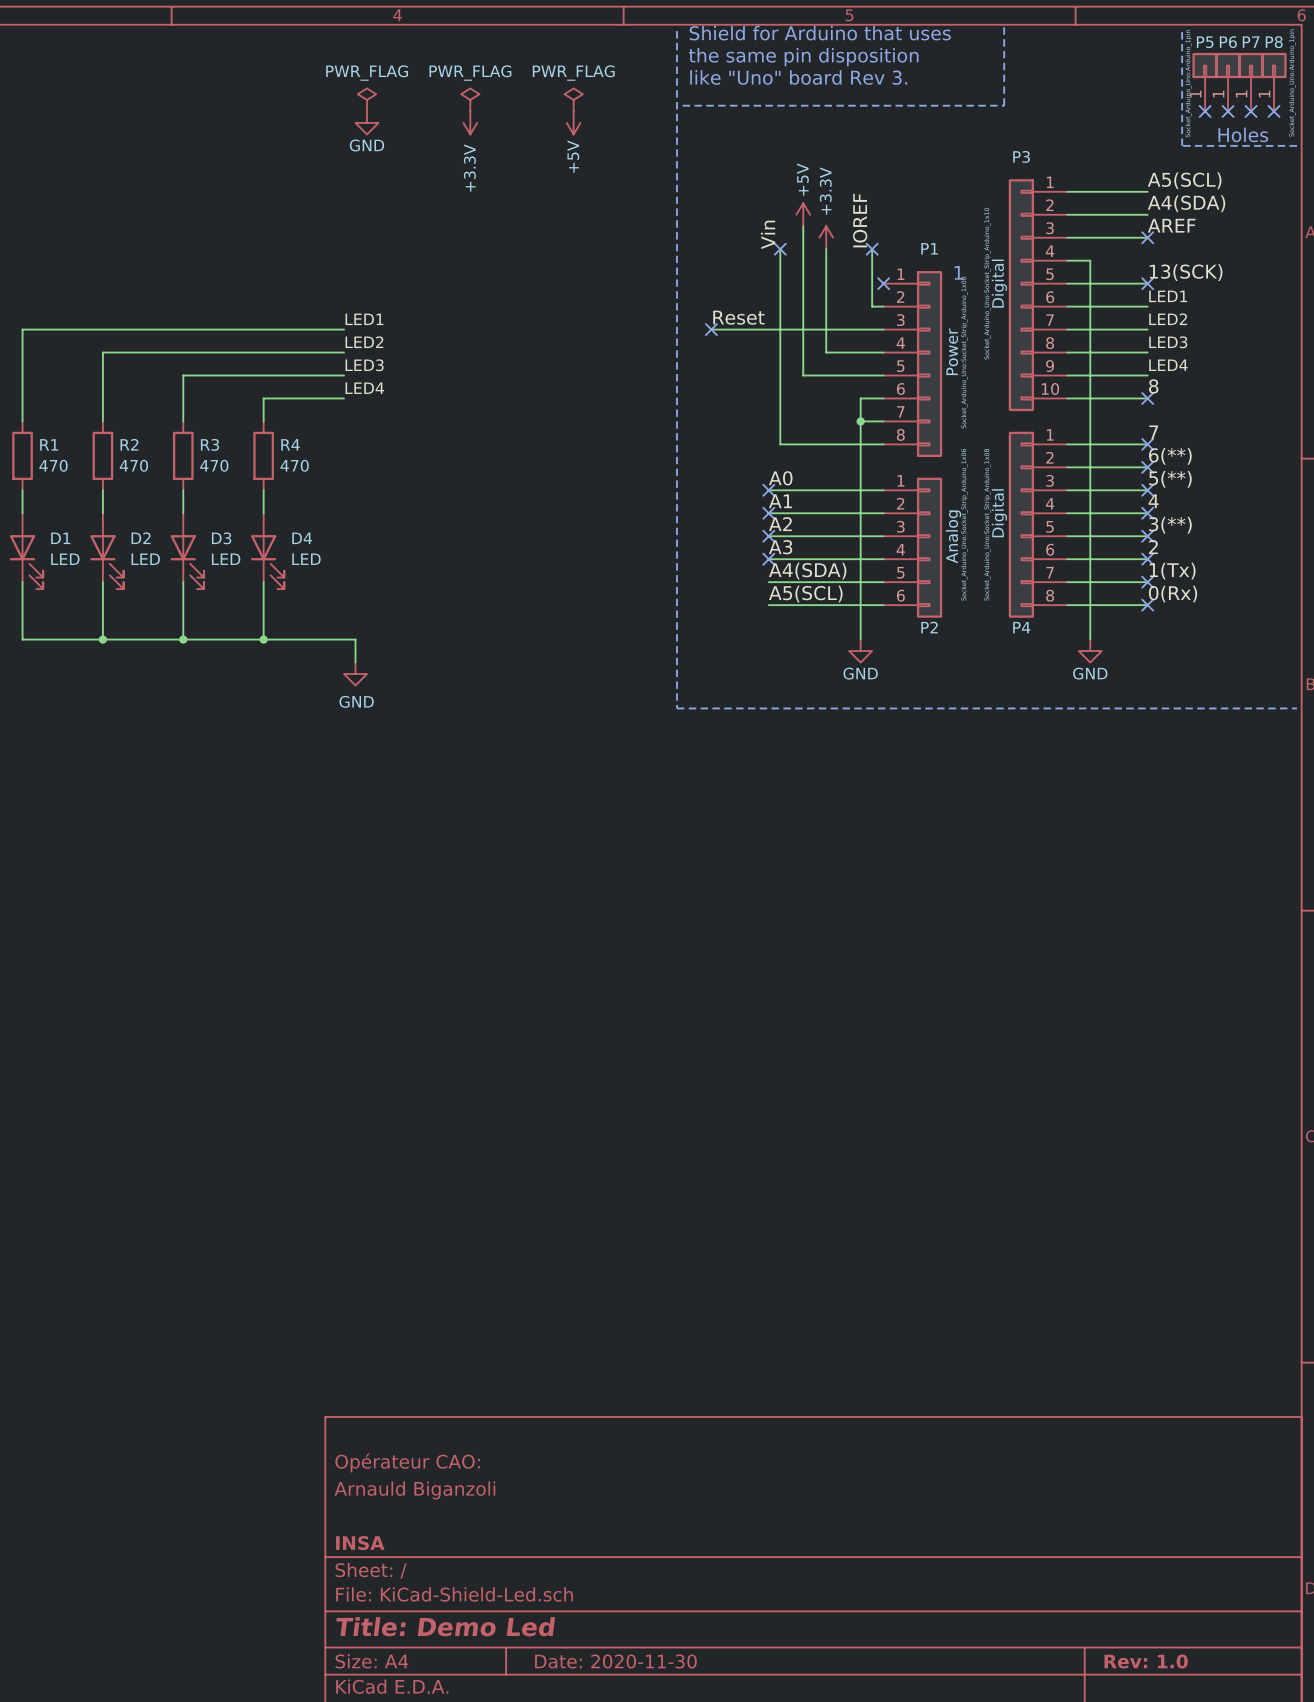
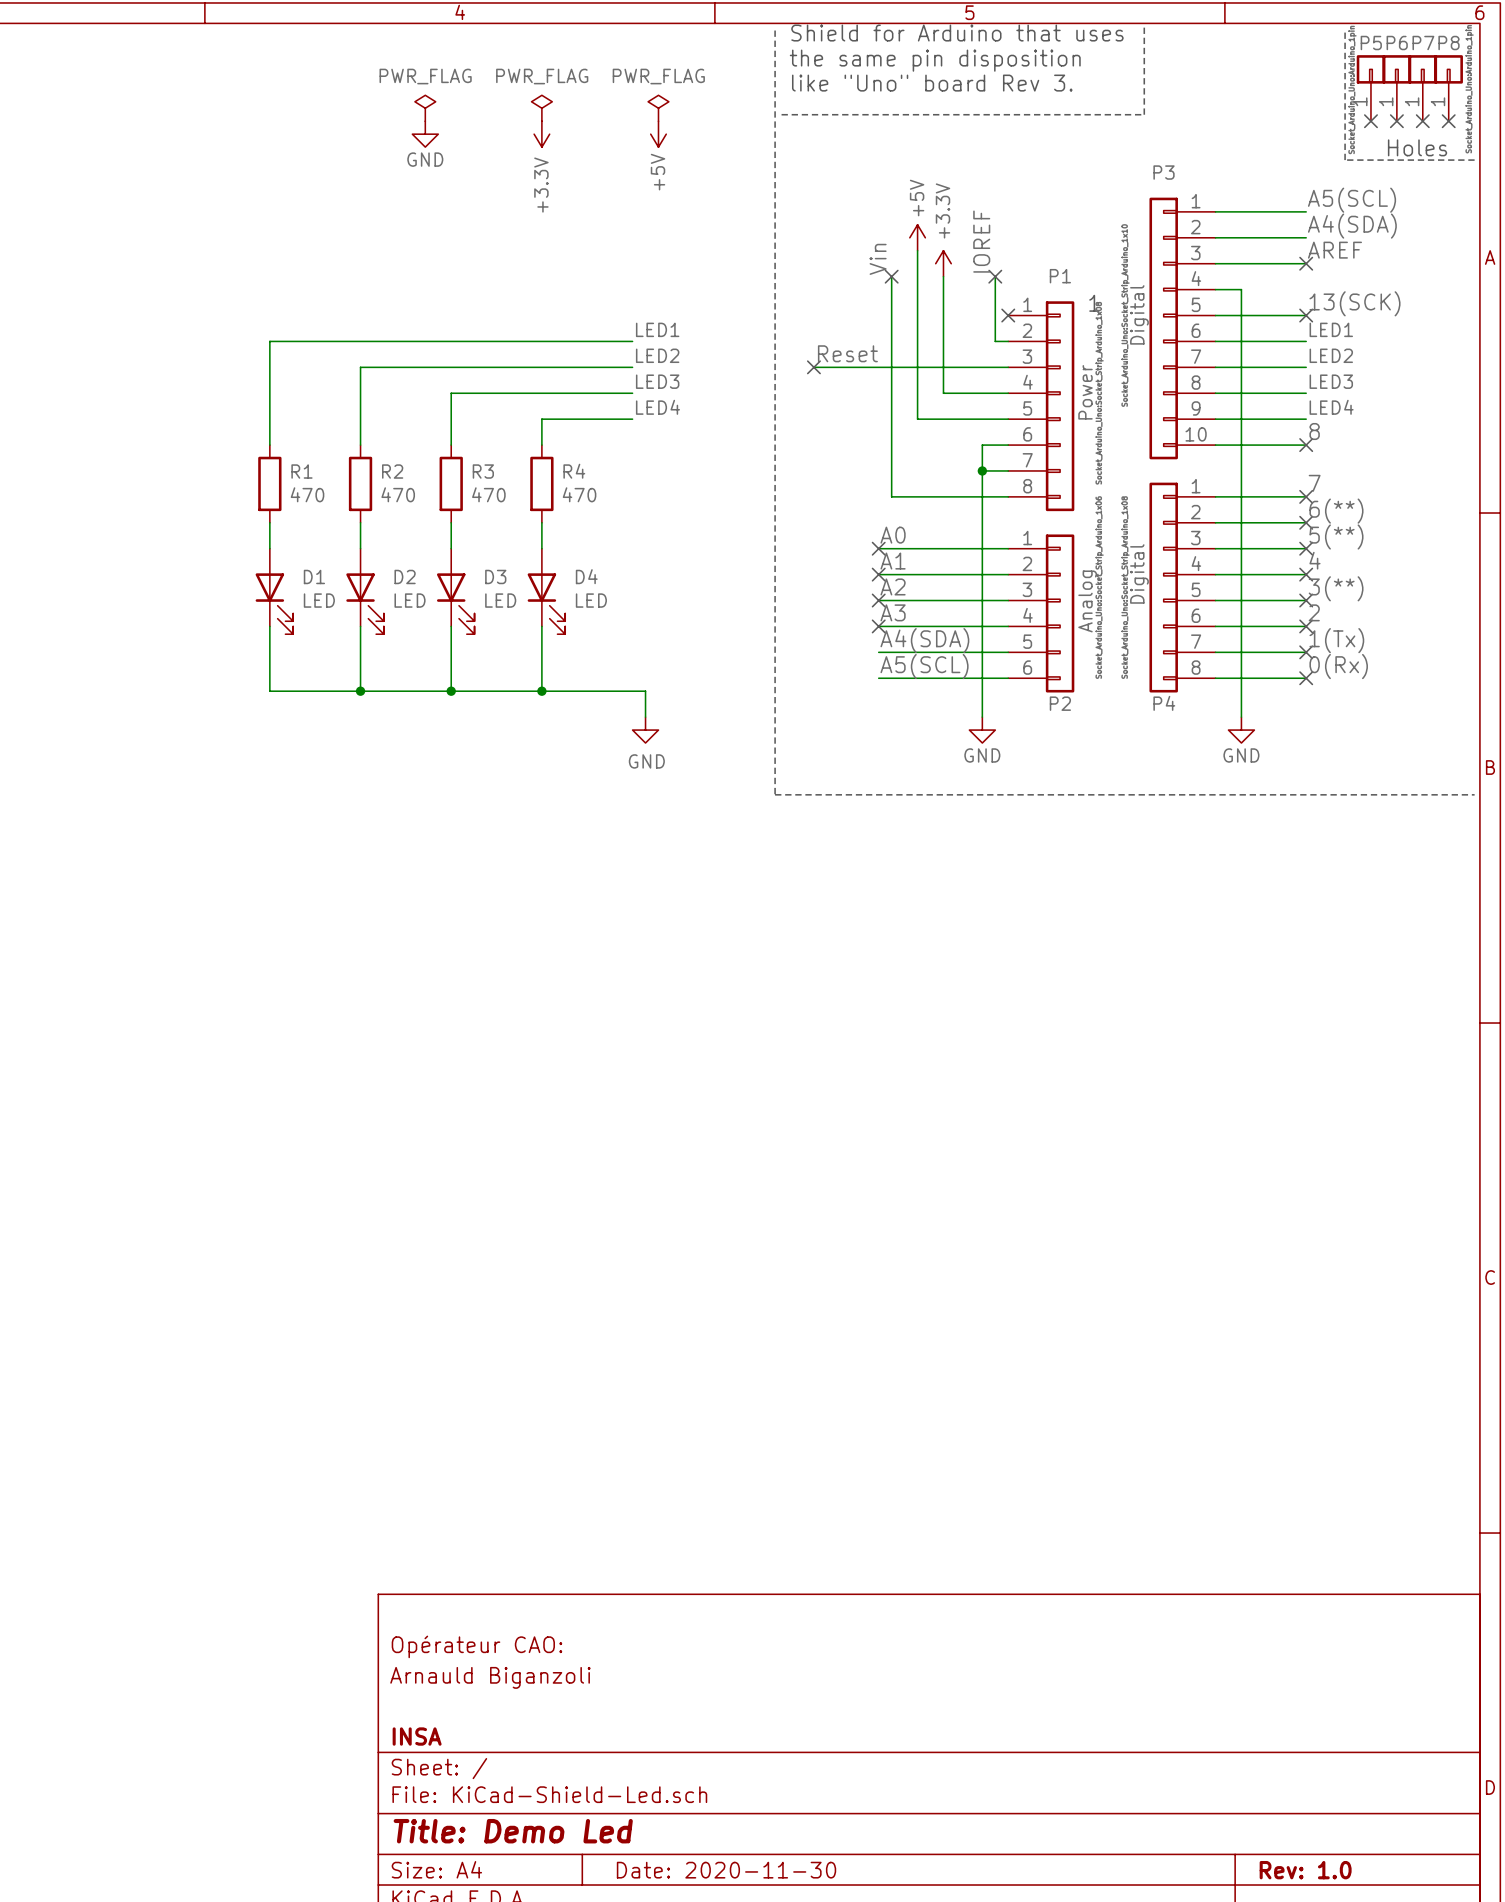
wire: none -> (632, 341) (269, 341) (269, 445)
label position: LED1 (364, 319) -> LED1 (657, 329)
wire: (309, 329) (22, 329) (22, 421) -> (360, 367) (360, 445)
wire: none -> (399, 367) (632, 367)
label position: LED2 (364, 342) -> LED2 (657, 355)
wire: (344, 352) (102, 352) (102, 421) -> none
label position: LED3 (364, 365) -> LED3 (657, 381)
wire: (344, 375) (183, 375) (183, 421) -> (632, 393) (451, 393) (451, 445)
label position: LED4 (364, 388) -> LED4 (657, 407)
wire: (344, 398) (263, 398) (263, 421) -> (632, 419) (541, 419) (541, 445)
R1 position: (22, 455) -> (269, 483)
R2 position: (102, 455) -> (360, 483)
R3 position: (183, 455) -> (451, 483)
R4 position: (263, 455) -> (541, 483)
wire: (22, 490) (22, 513) -> (269, 522) (269, 548)
wire: (102, 490) (102, 513) -> (360, 522) (360, 548)
wire: (183, 490) (183, 513) -> (451, 522) (451, 548)
wire: (263, 490) (263, 513) -> (541, 522) (541, 548)
D1 position: (26, 551) -> (274, 591)
D2 position: (106, 551) -> (365, 591)
D3 position: (187, 551) -> (455, 591)
D4 position: (267, 551) -> (546, 591)
wire: (22, 582) (22, 639) (355, 639) (355, 662) -> (269, 626) (269, 691) (645, 691) (645, 717)
wire: (102, 582) (102, 639) -> (360, 626) (360, 691)
wire: (183, 582) (183, 639) -> (451, 626) (451, 691)
wire: (263, 582) (263, 639) -> (541, 626) (541, 691)
junction: none -> (451, 691)
junction: none -> (541, 691)
junction: (102, 639) -> none
junction: (183, 639) -> none
junction position: (263, 639) -> (360, 691)
power symbol position: GND (355, 674) -> GND (645, 730)

